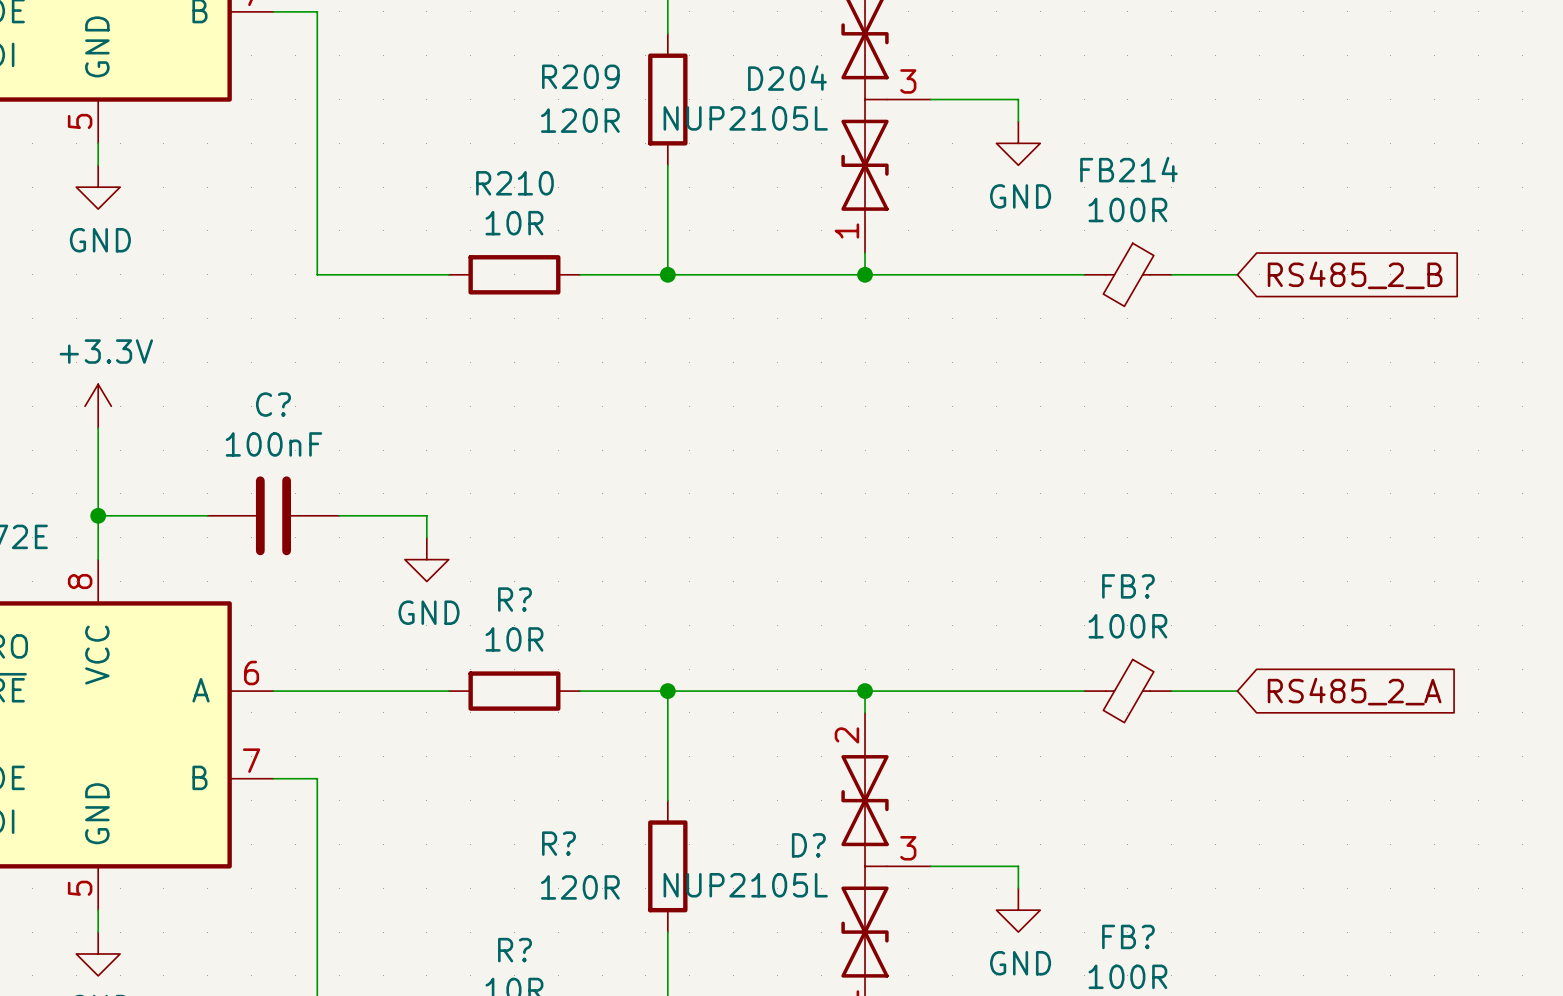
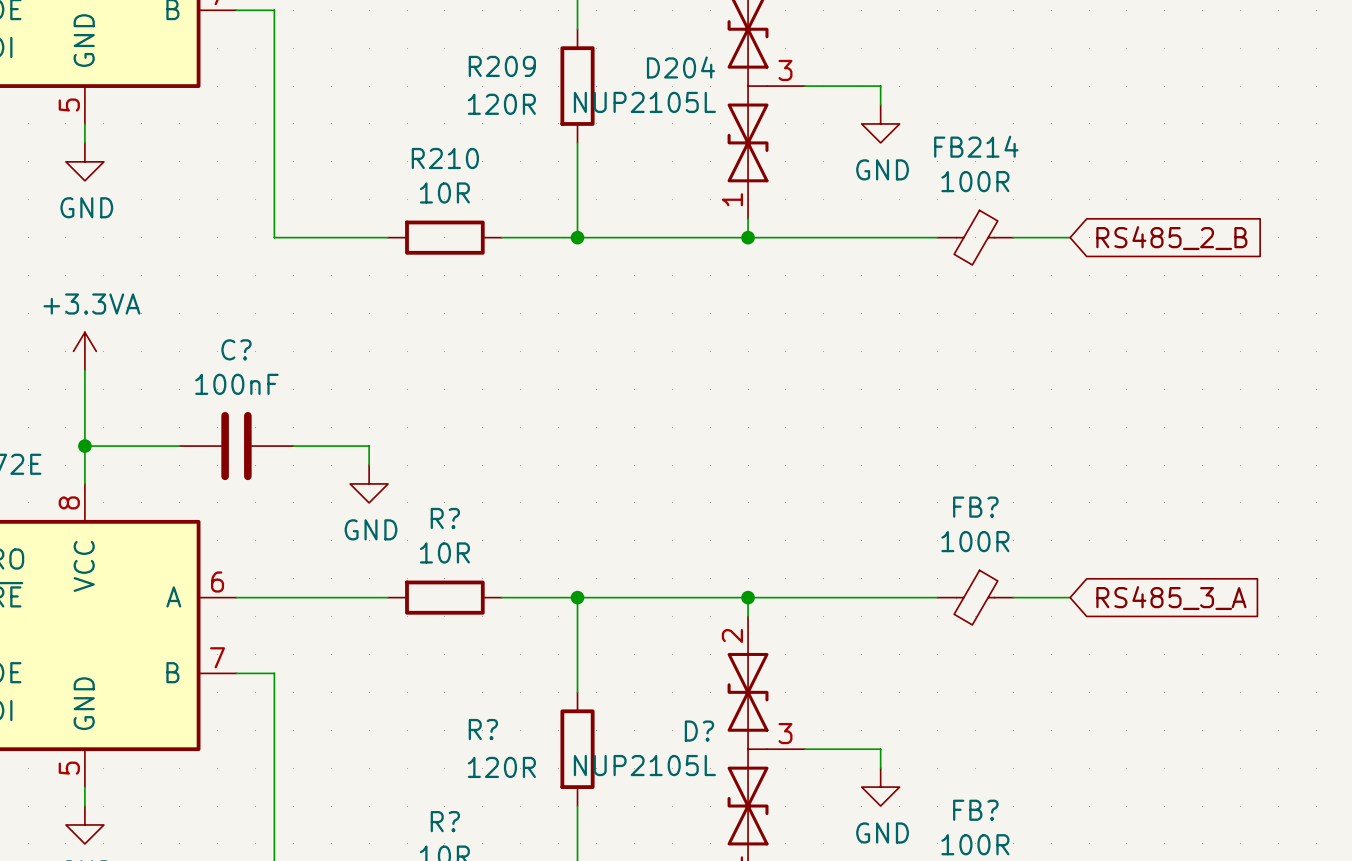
power symbol: +3.3V (98, 406) -> +3.3VA (84, 351)
global label: RS485_2_A (1354, 691) -> RS485_3_A (1171, 598)

